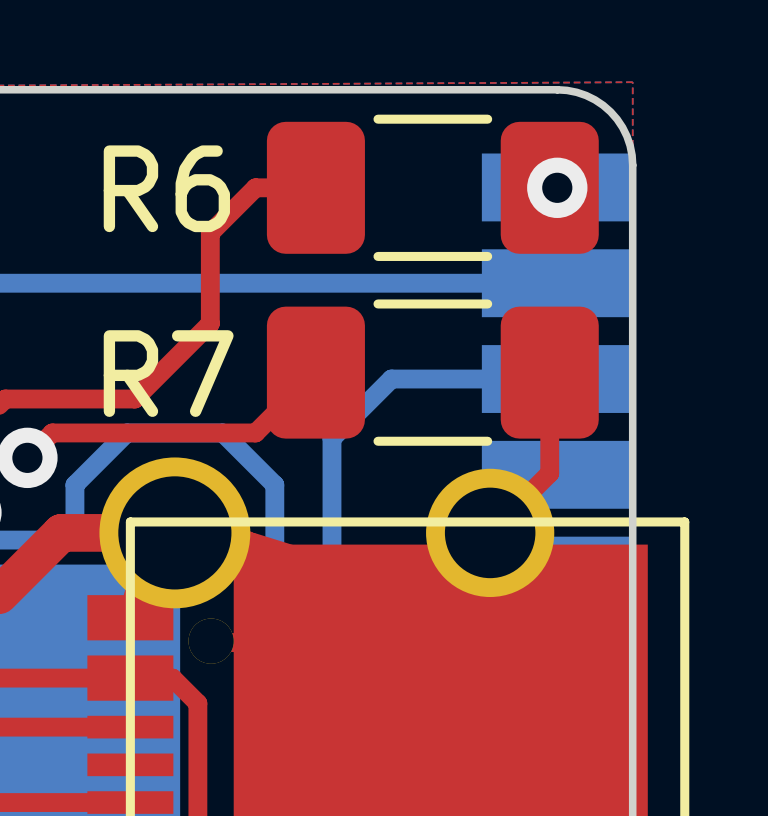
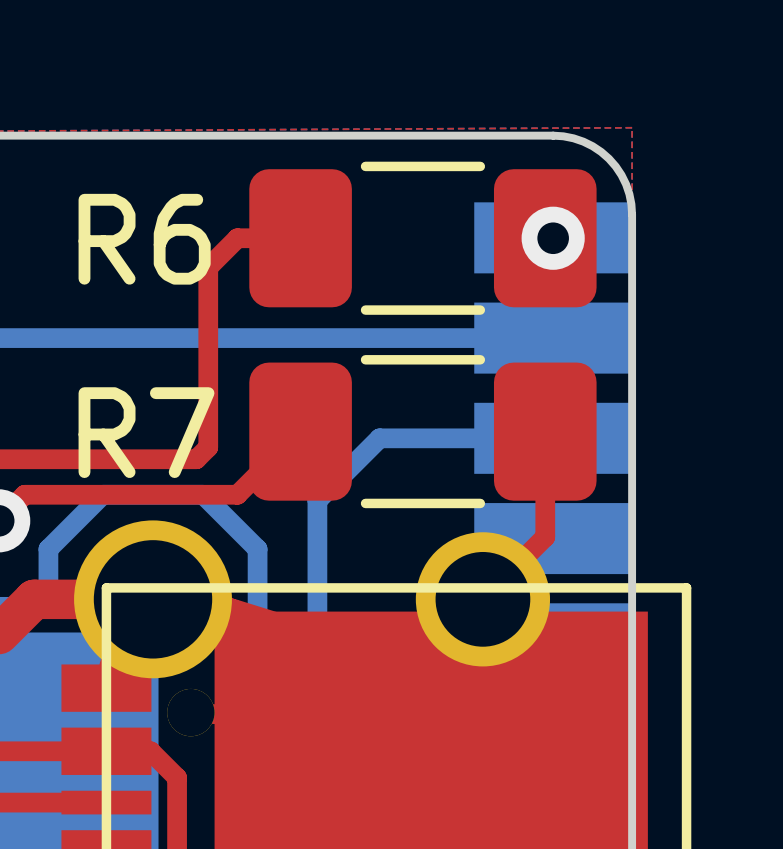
top track: (227, 215) (210, 233) (210, 323) (134, 399) -> (208, 267) (208, 447) (196, 459) (111, 459)

